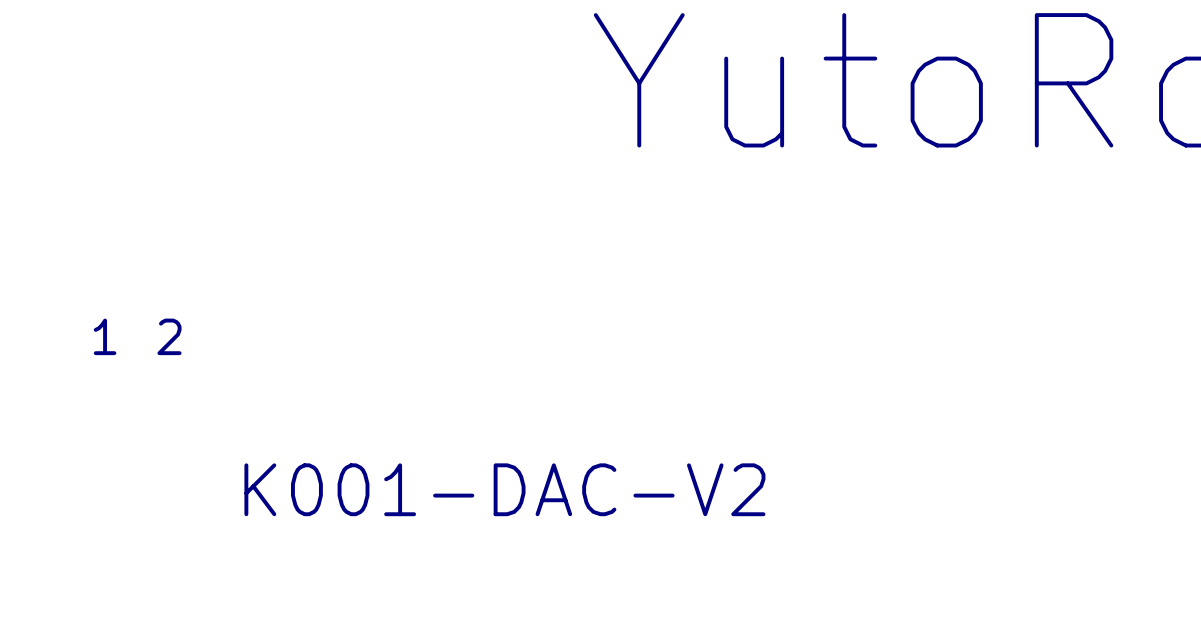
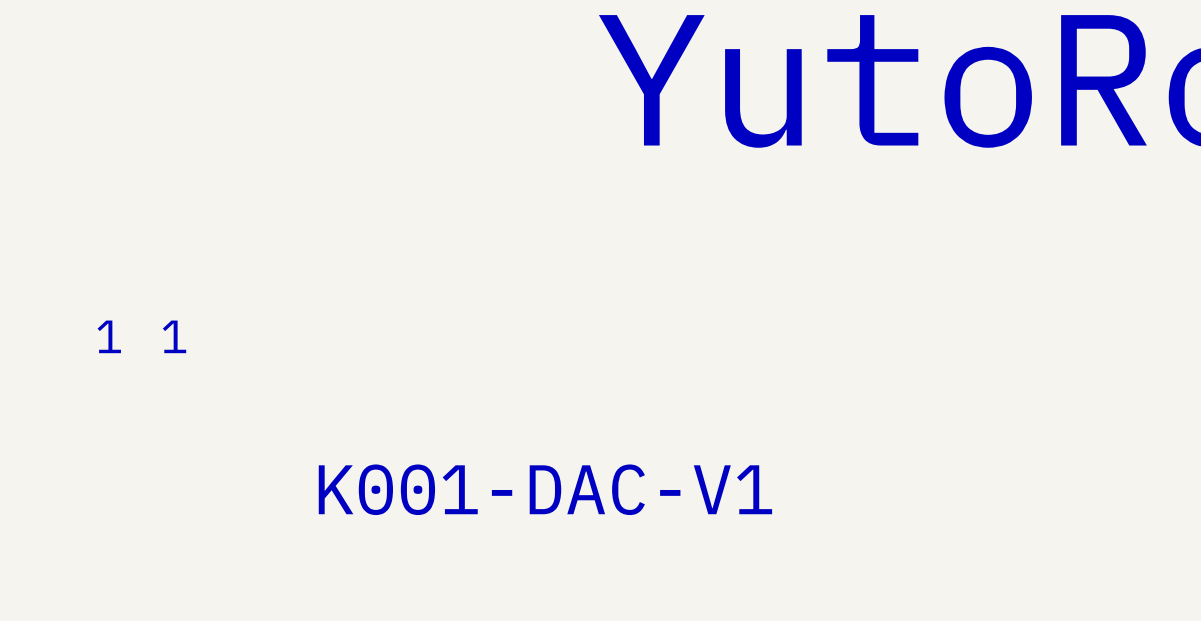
text: 2 (169, 336) -> 1 (174, 336)
text: K001-DAC-V2 (504, 489) -> K001-DAC-V1 (545, 489)

